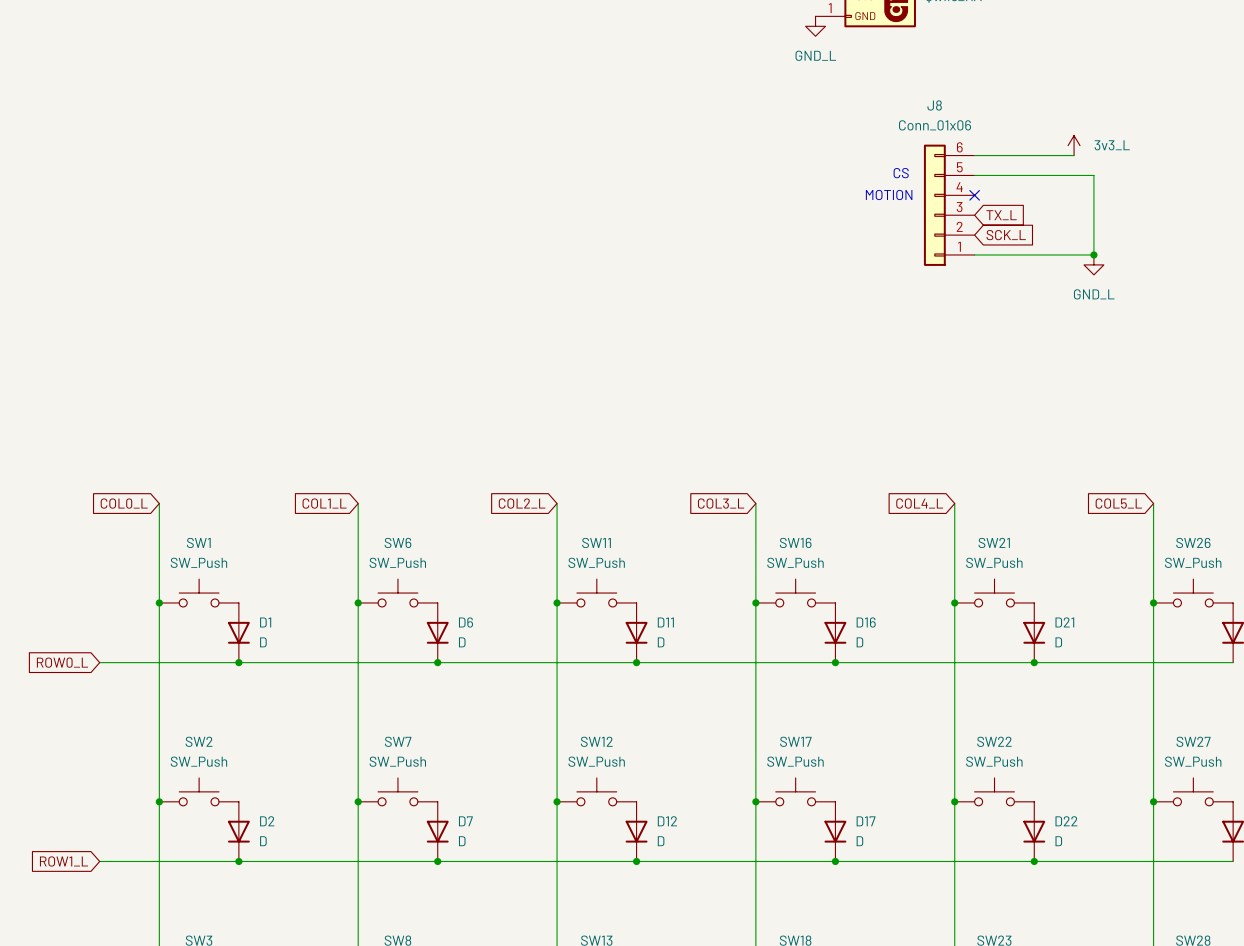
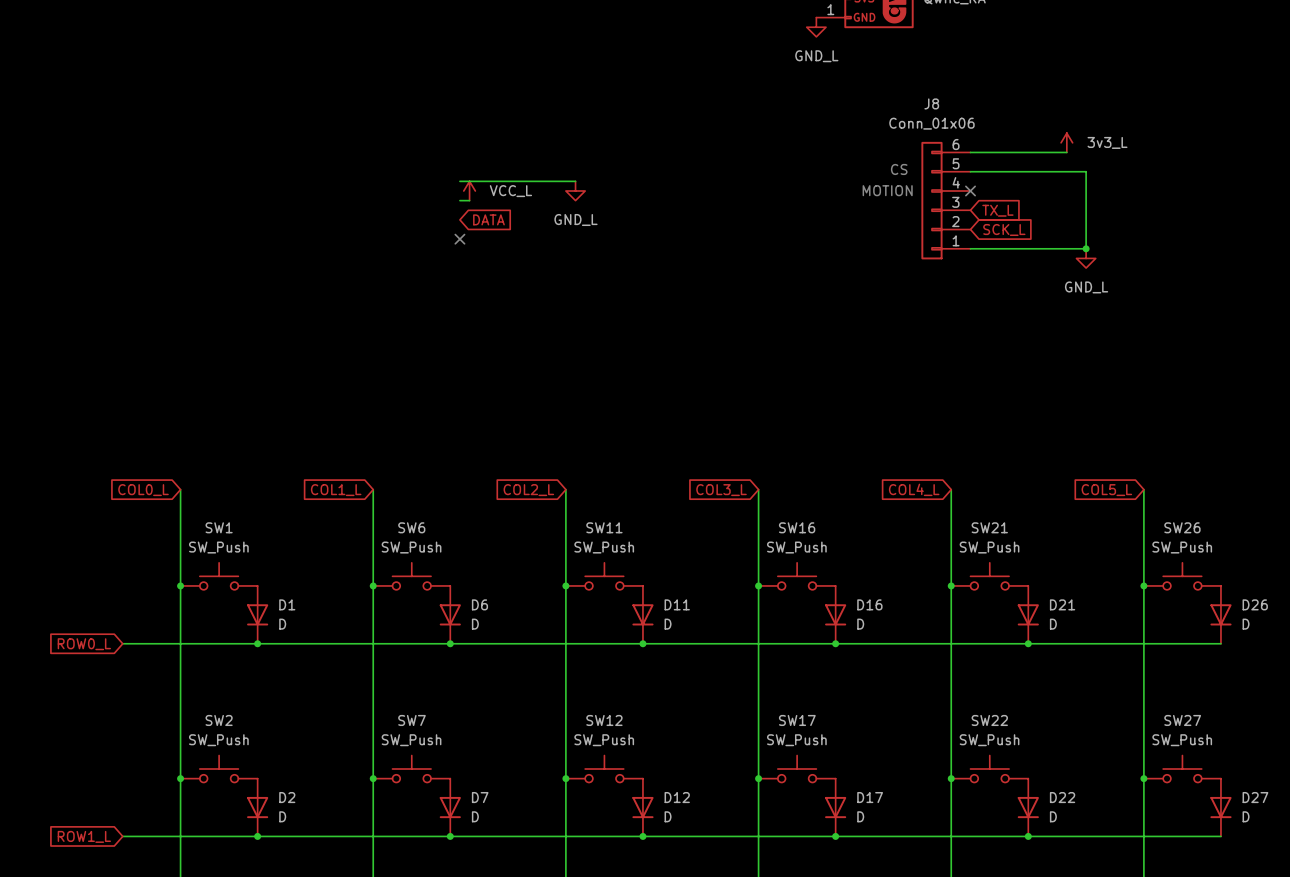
wire: none -> (459, 181) (575, 181)
power symbol: none -> VCC_L (469, 190)
power symbol: none -> GND_L (575, 190)
wire: none -> (459, 200) (469, 200)
global label: none -> DATA (488, 219)
no-connect mark: none -> (459, 239)

